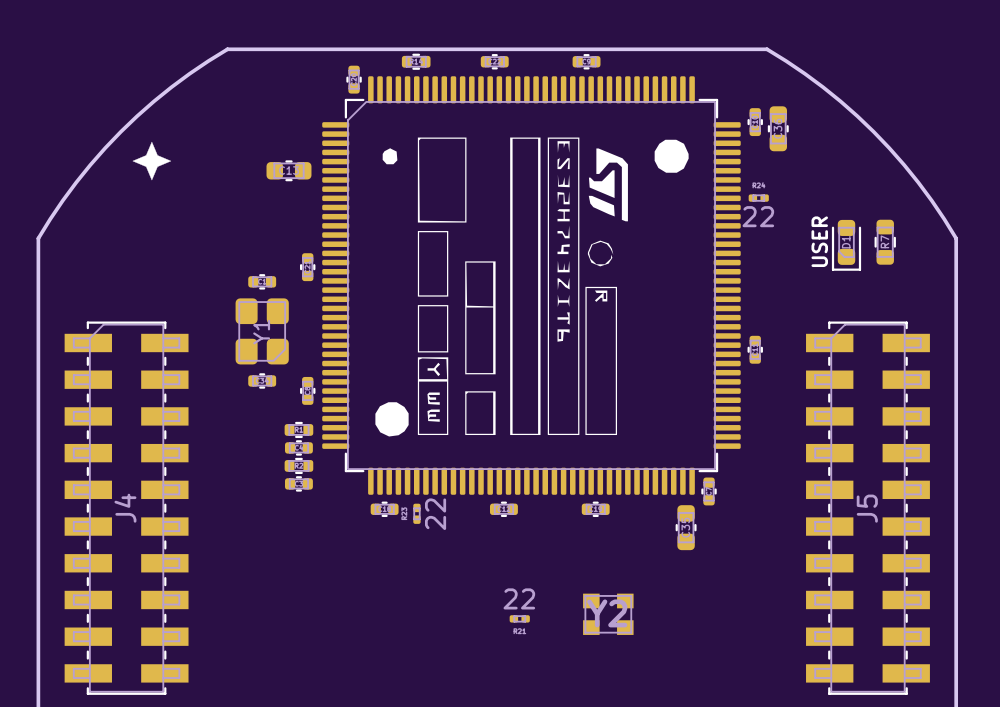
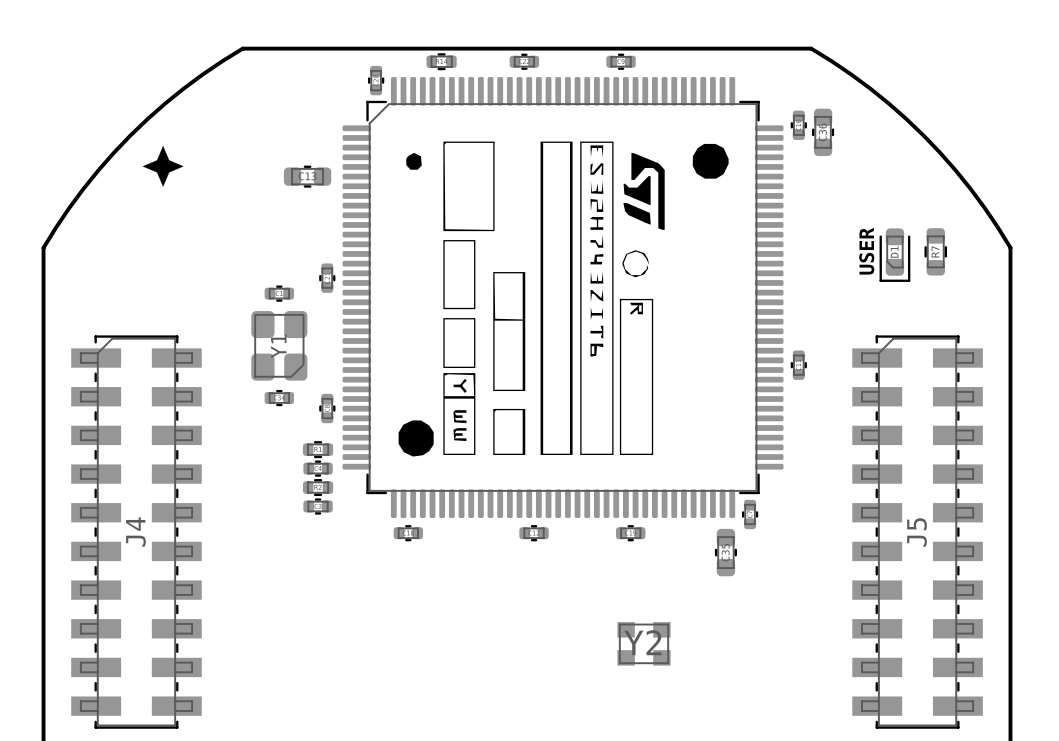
part: 22 (758, 198) -> none
part: 22 (416, 513) -> none
part: 22 (519, 618) -> none

